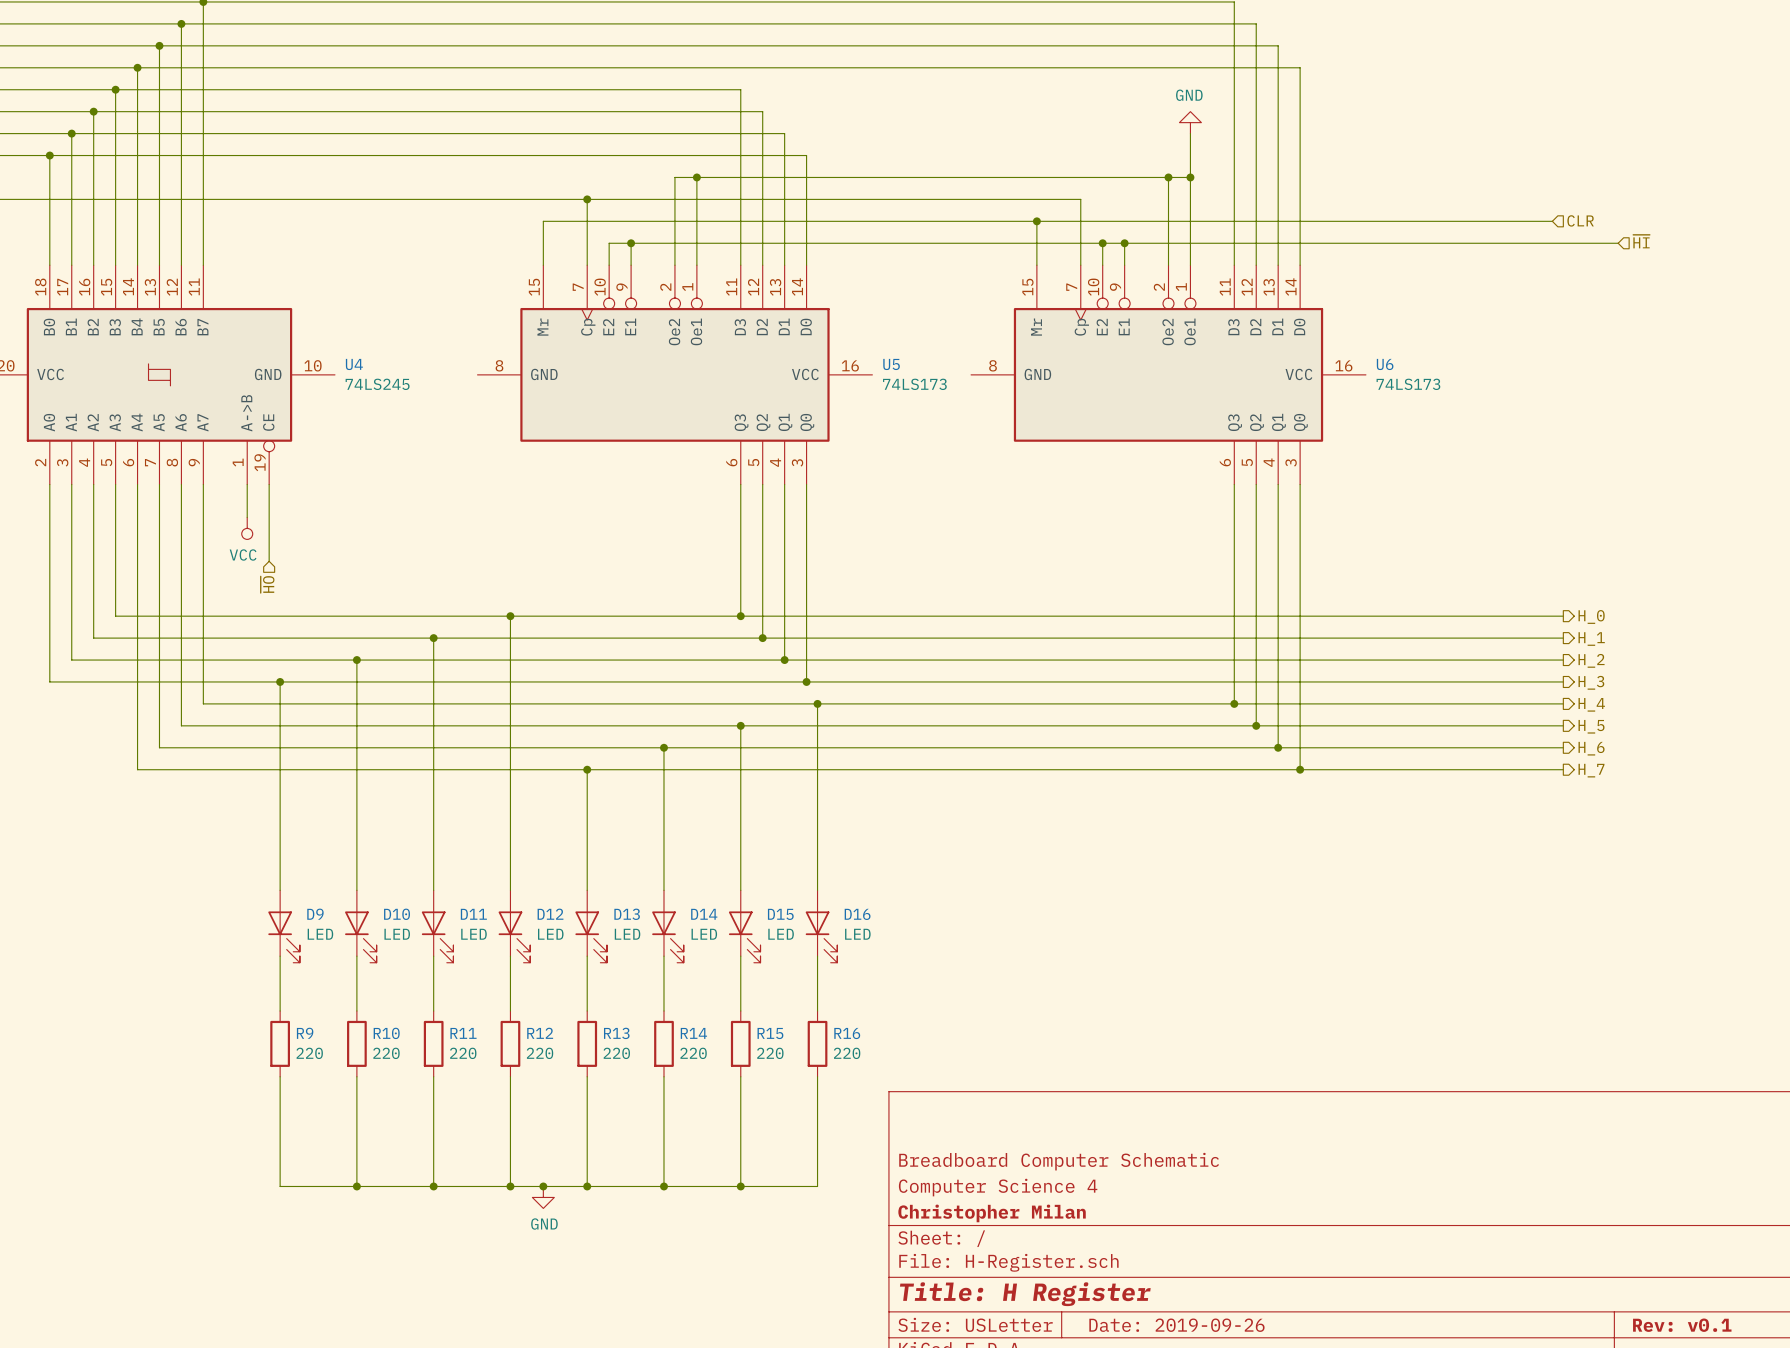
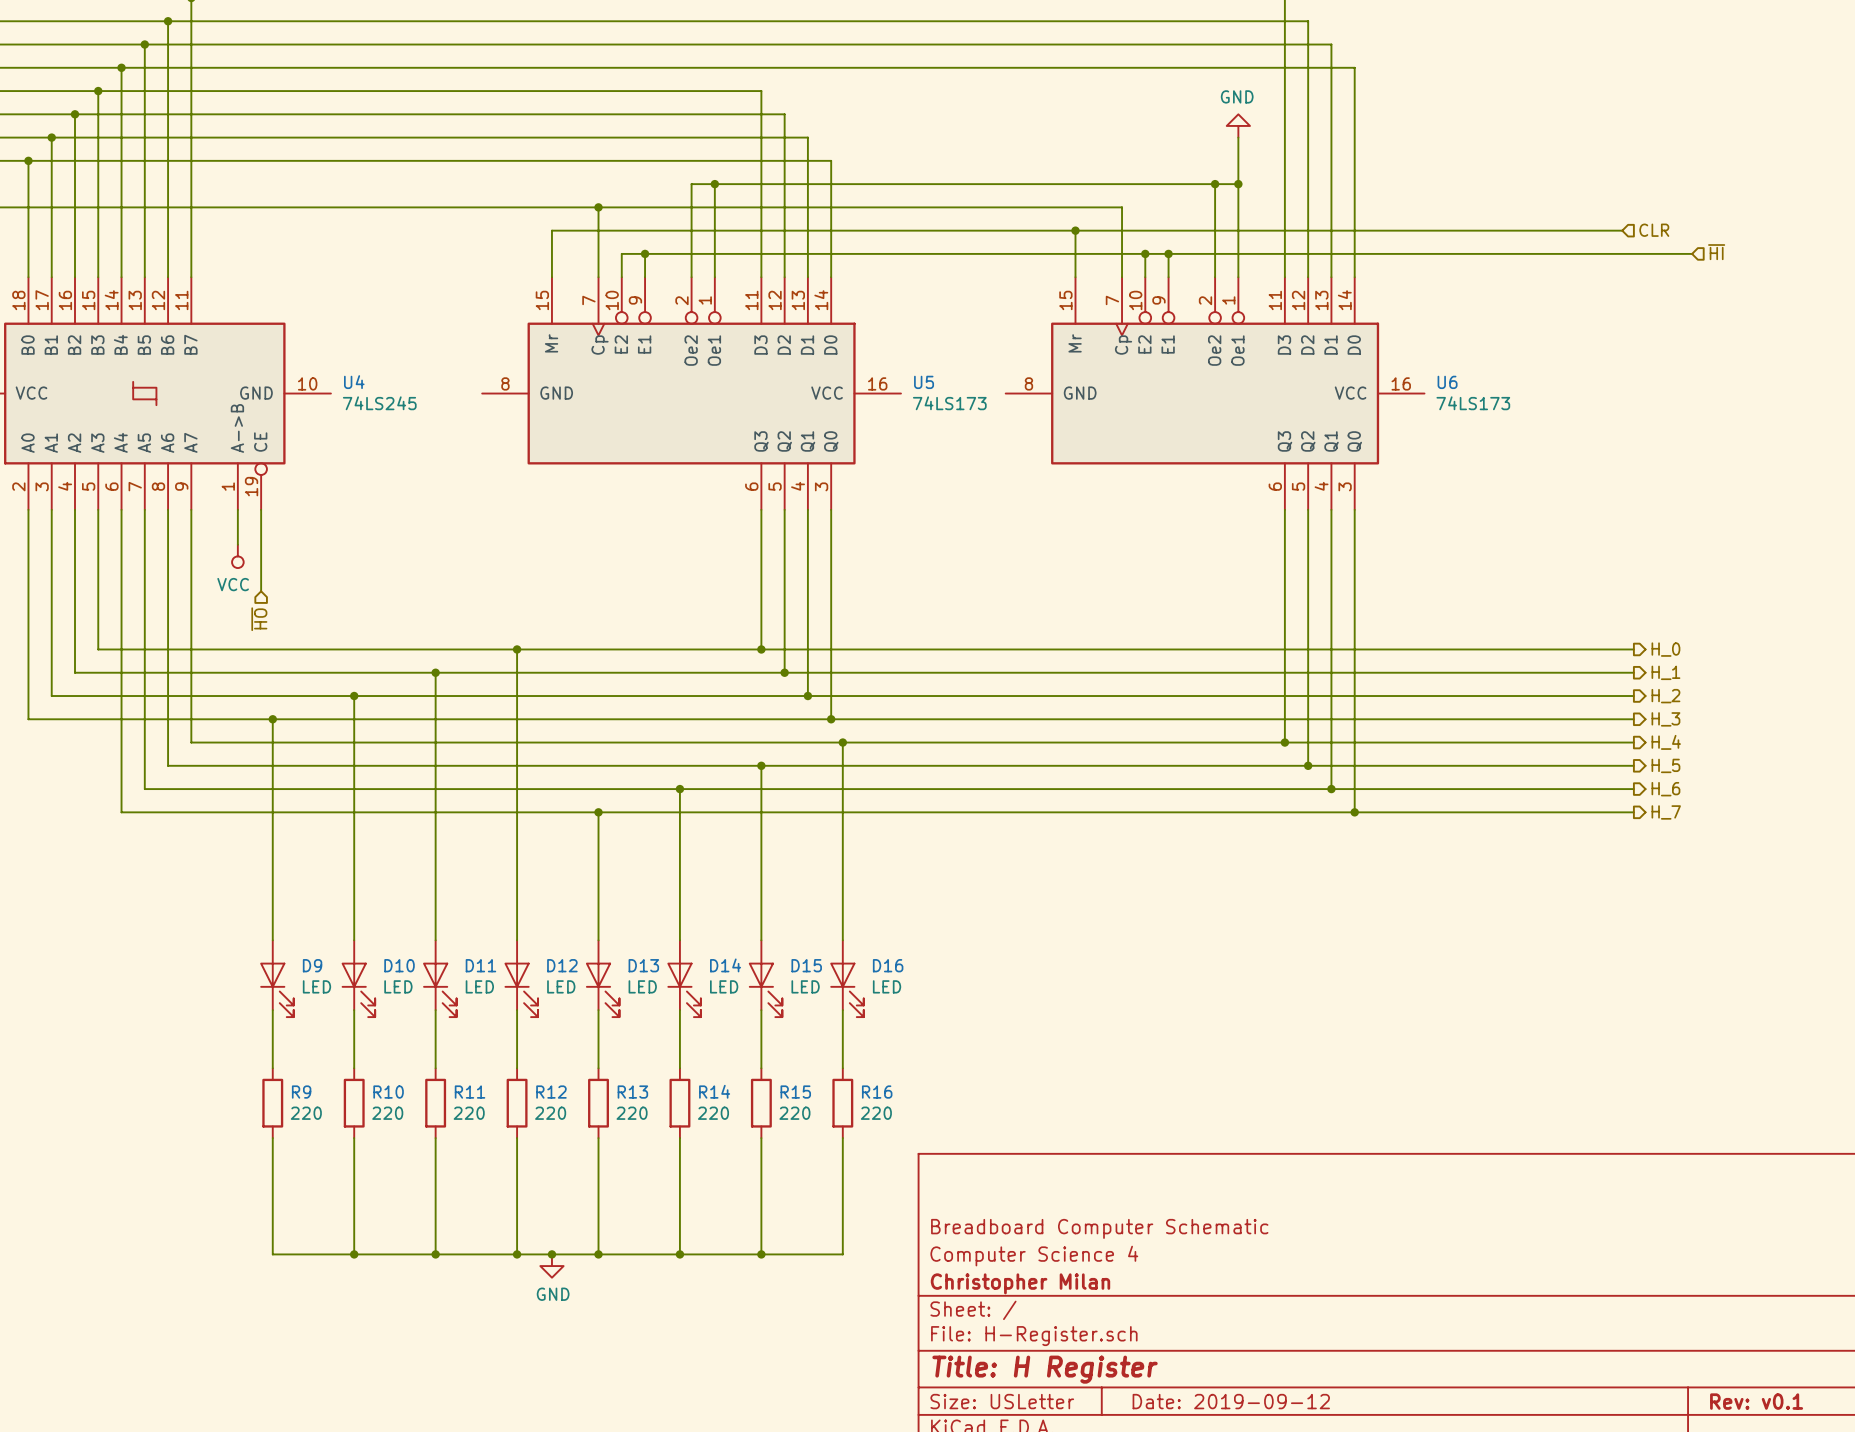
title block: Date: 2019-09-26 (1176, 1325) -> Date: 2019-09-12 (1231, 1401)

